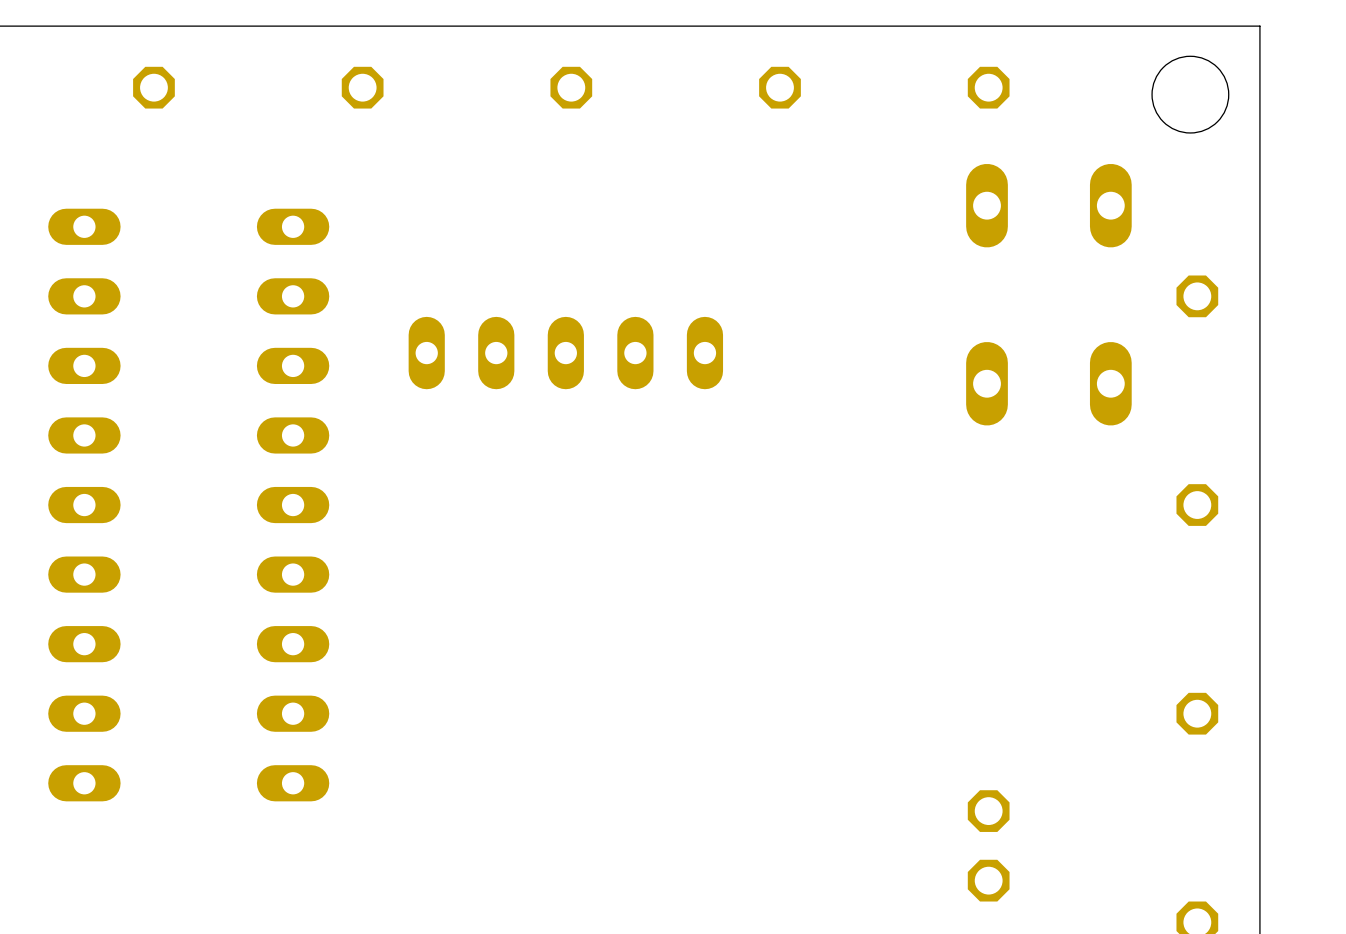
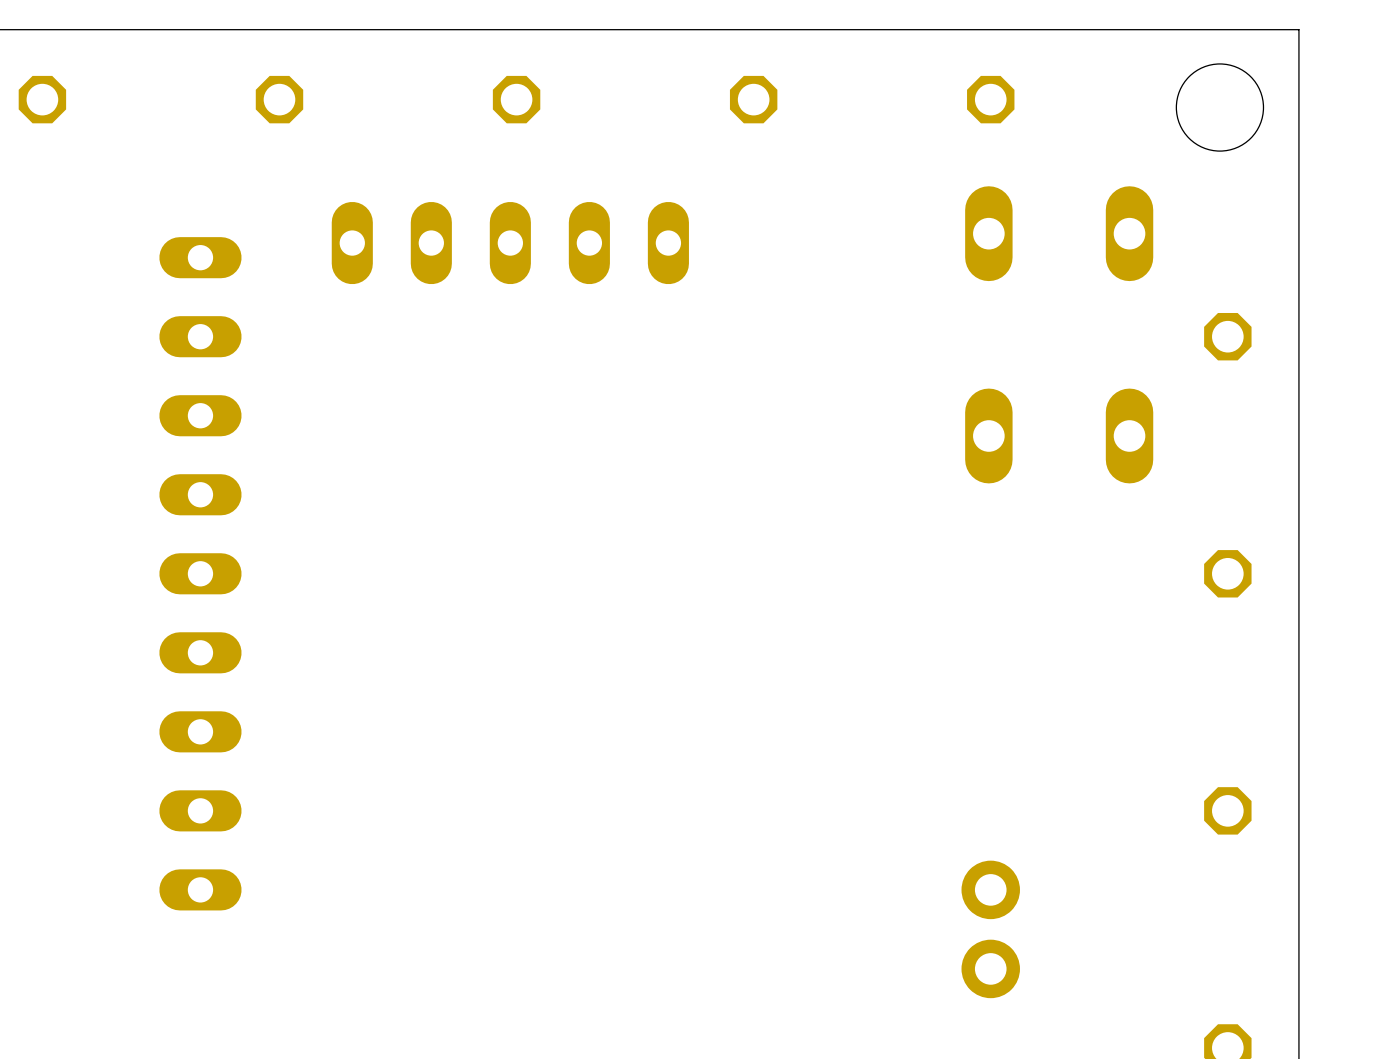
part position: (565, 353) -> (510, 243)
part footprint: [967, 790, 1010, 832] -> [961, 860, 1020, 999]
part: (988, 880) -> none

